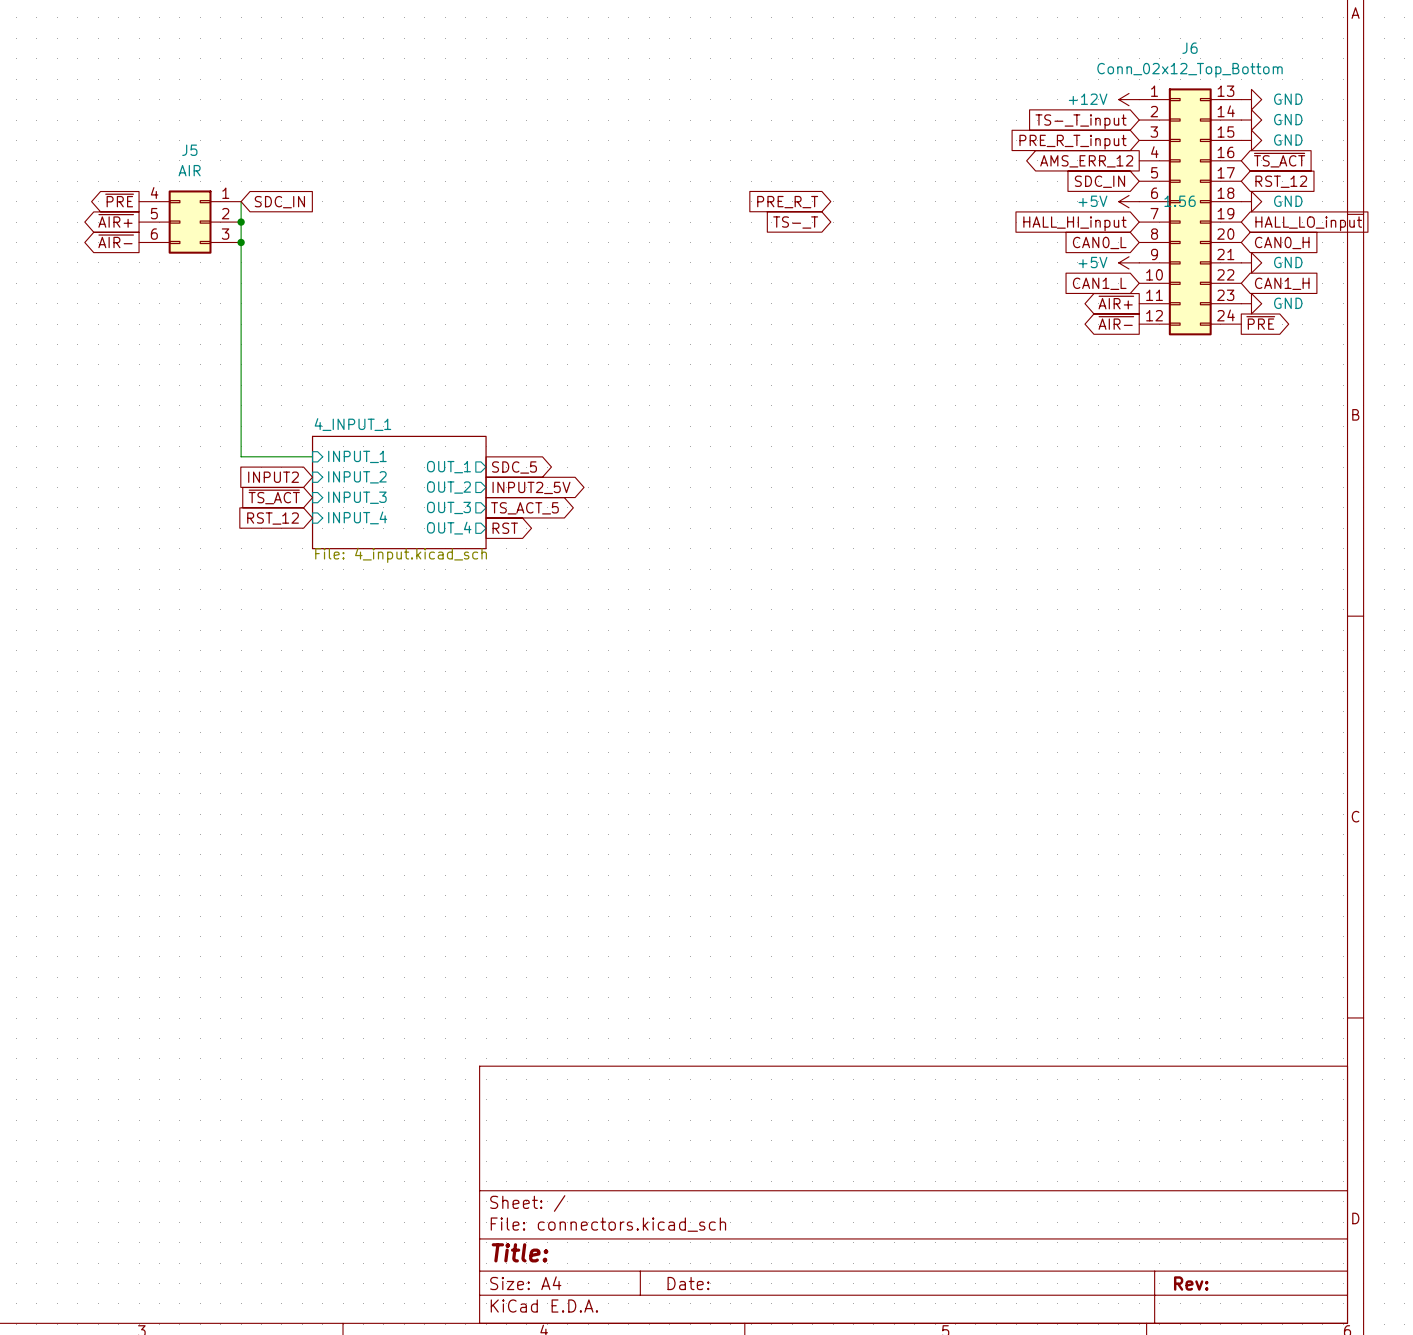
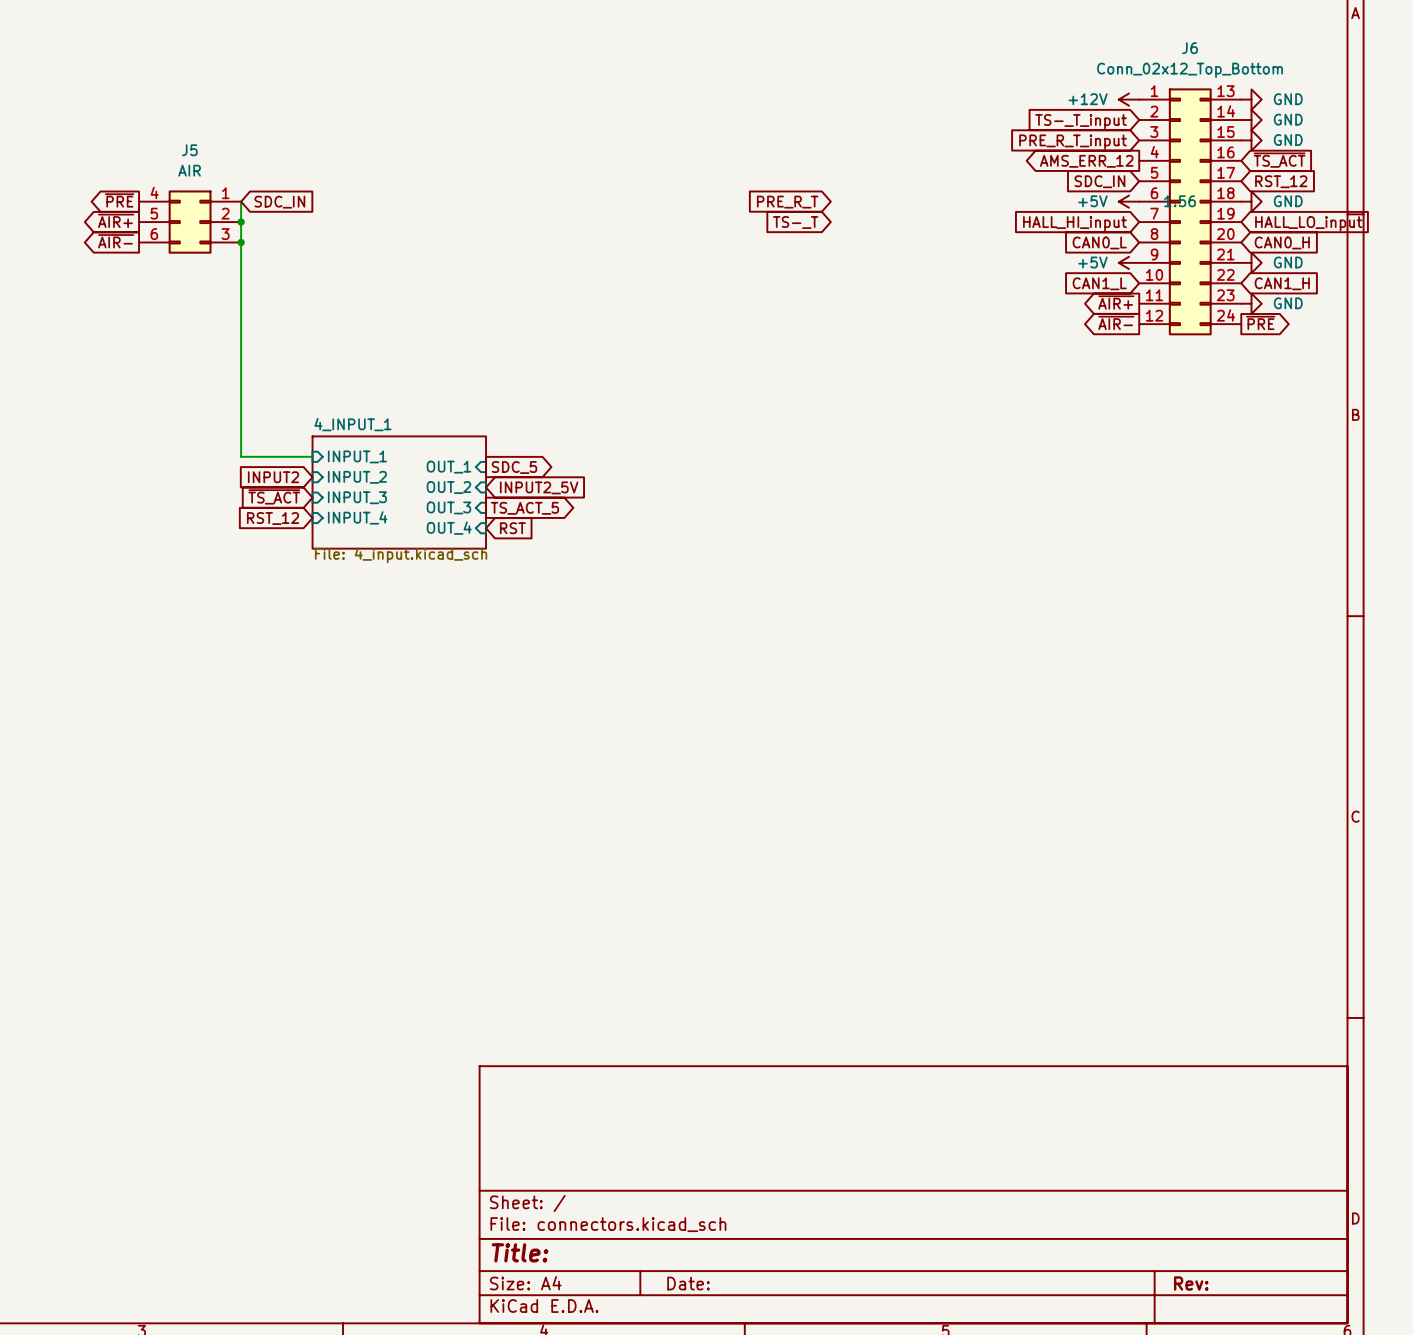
sheet pin shape: output (448, 467) -> input (448, 467)
sheet pin shape: output (448, 487) -> input (448, 487)
global label shape: output (531, 487) -> input (539, 487)
sheet pin shape: output (448, 507) -> input (448, 507)
sheet pin shape: output (449, 528) -> input (449, 528)
global label shape: output (505, 528) -> input (512, 528)

